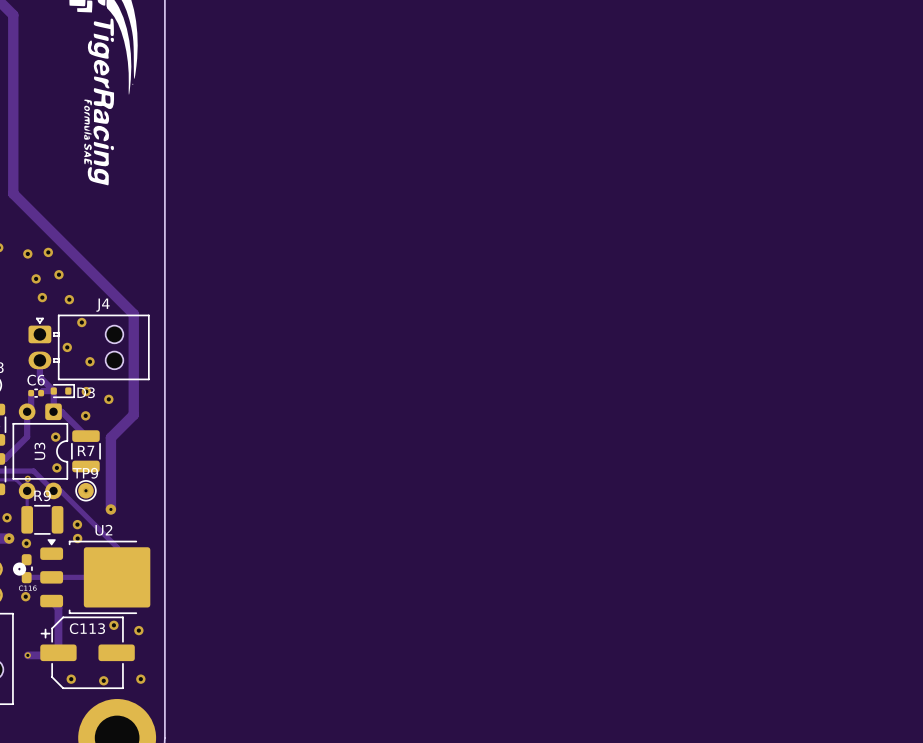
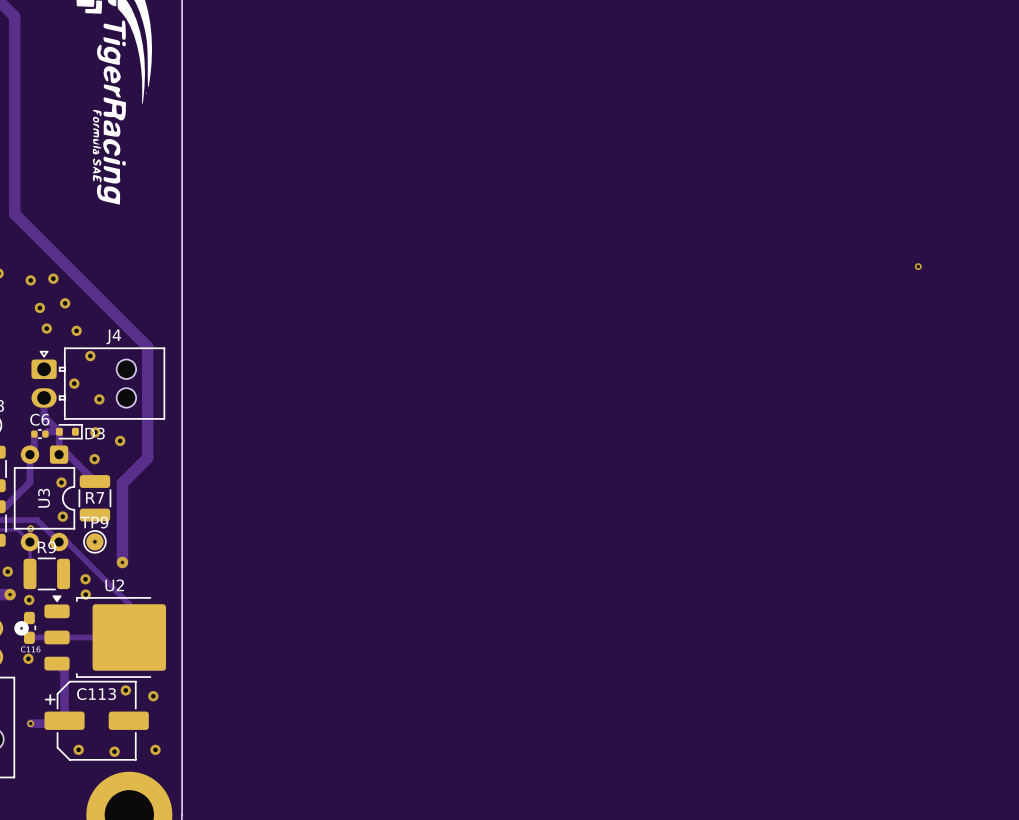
via: none -> (918, 266)

